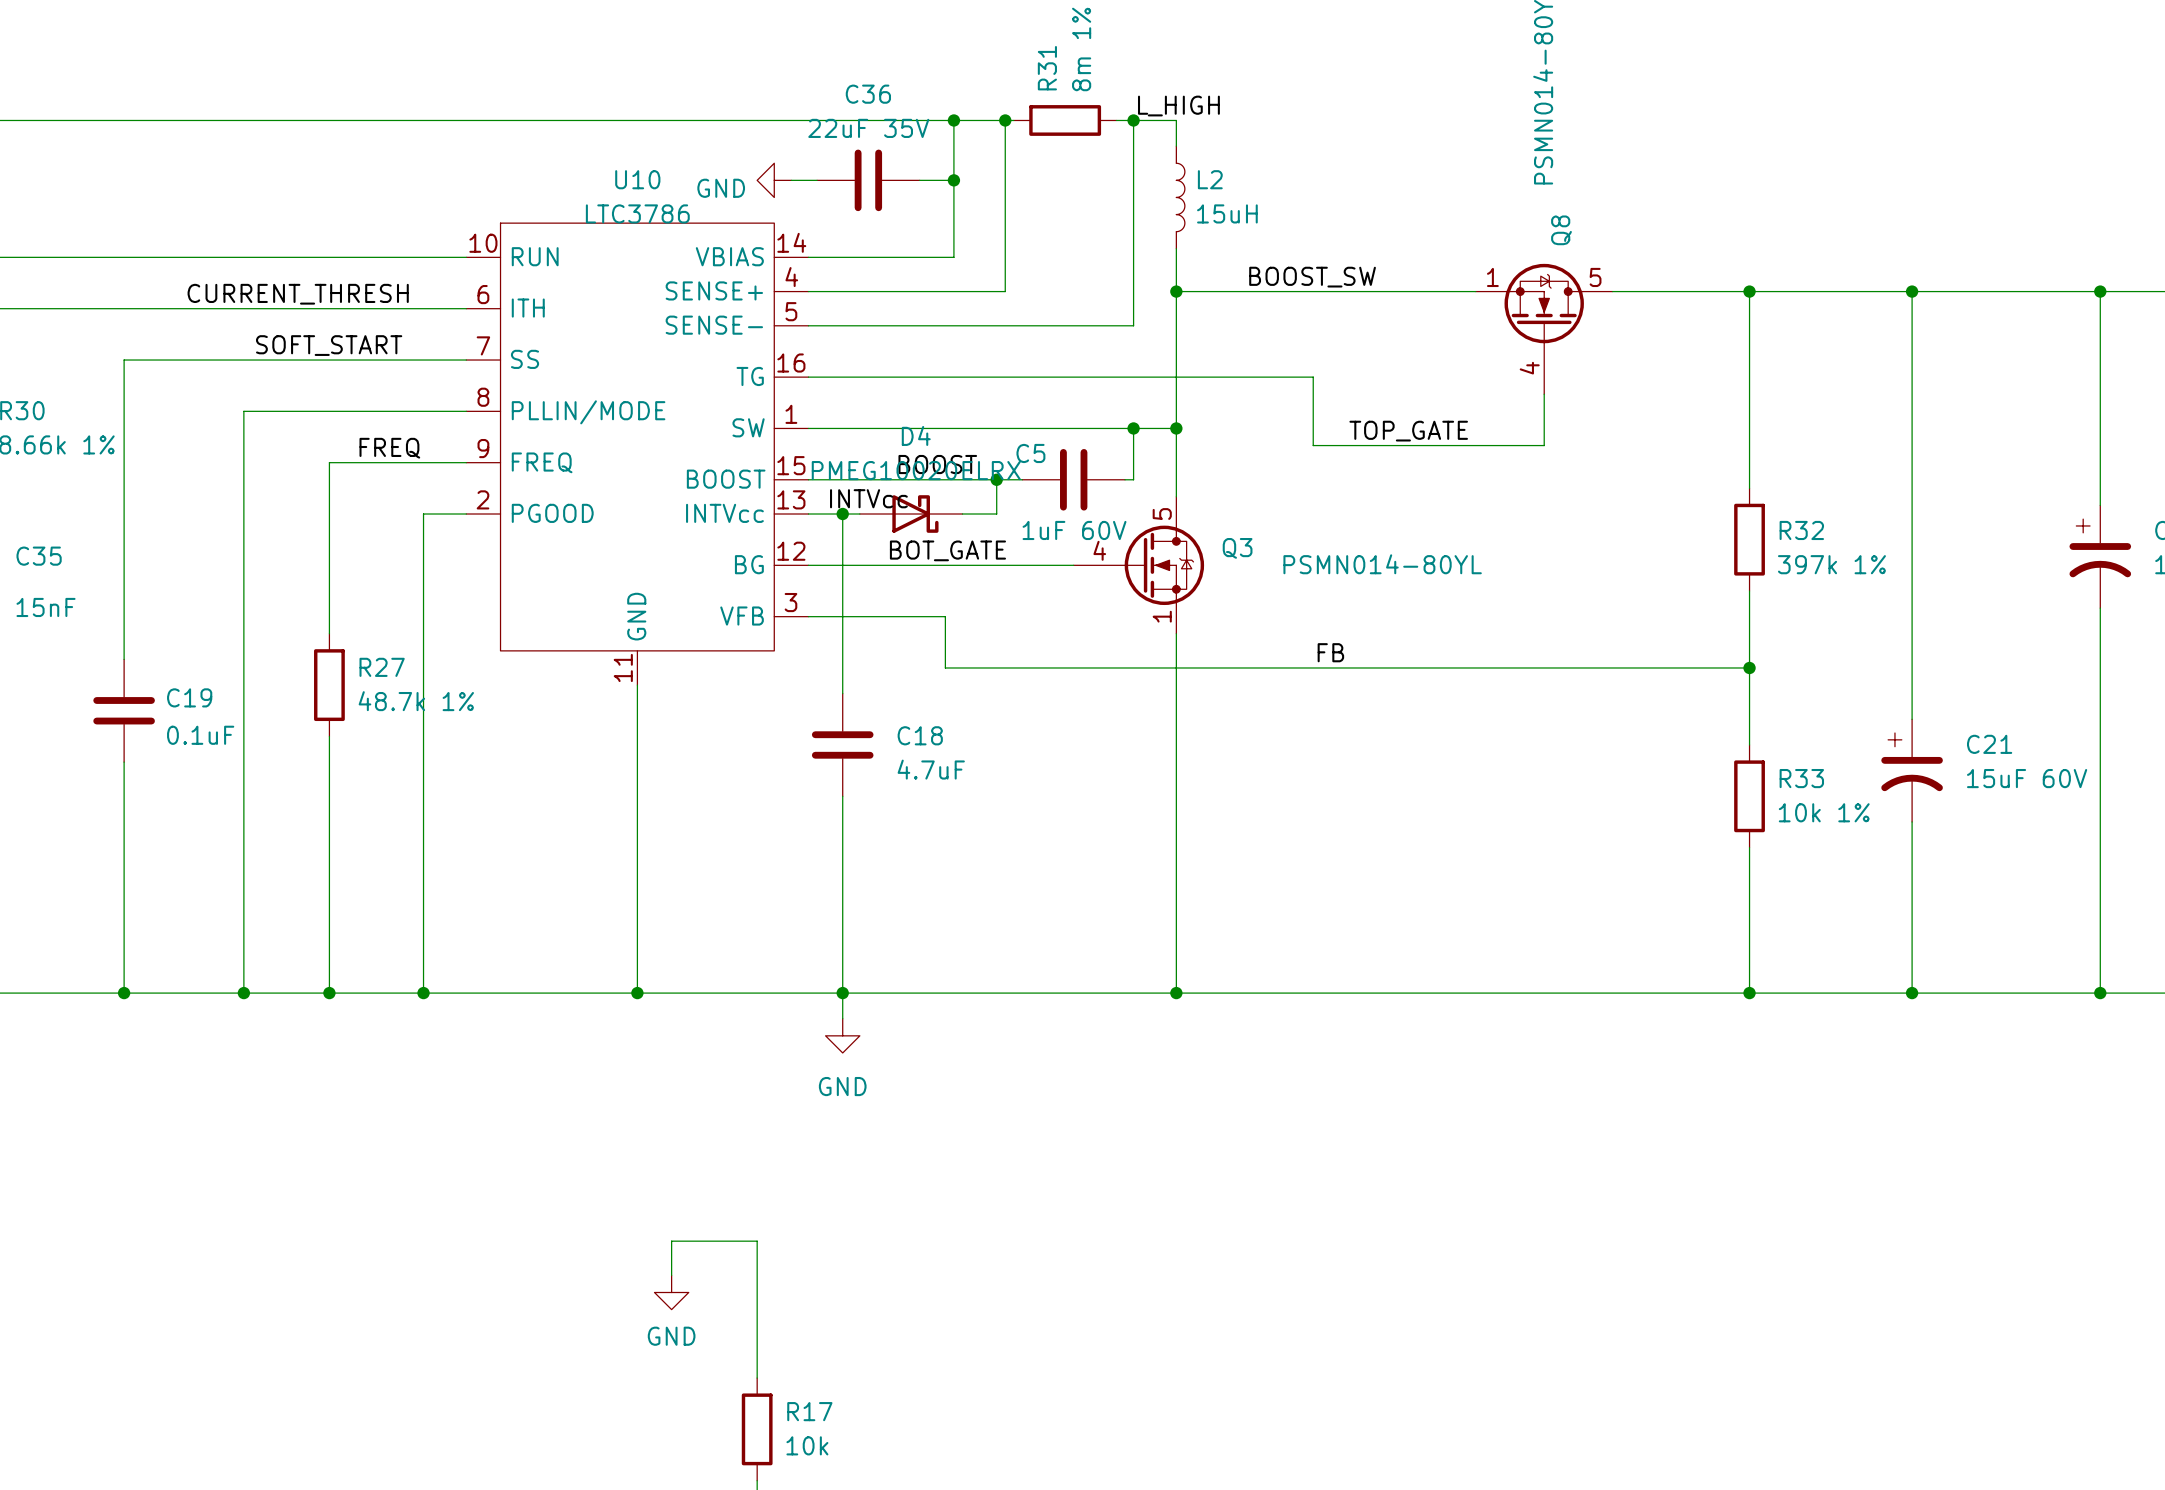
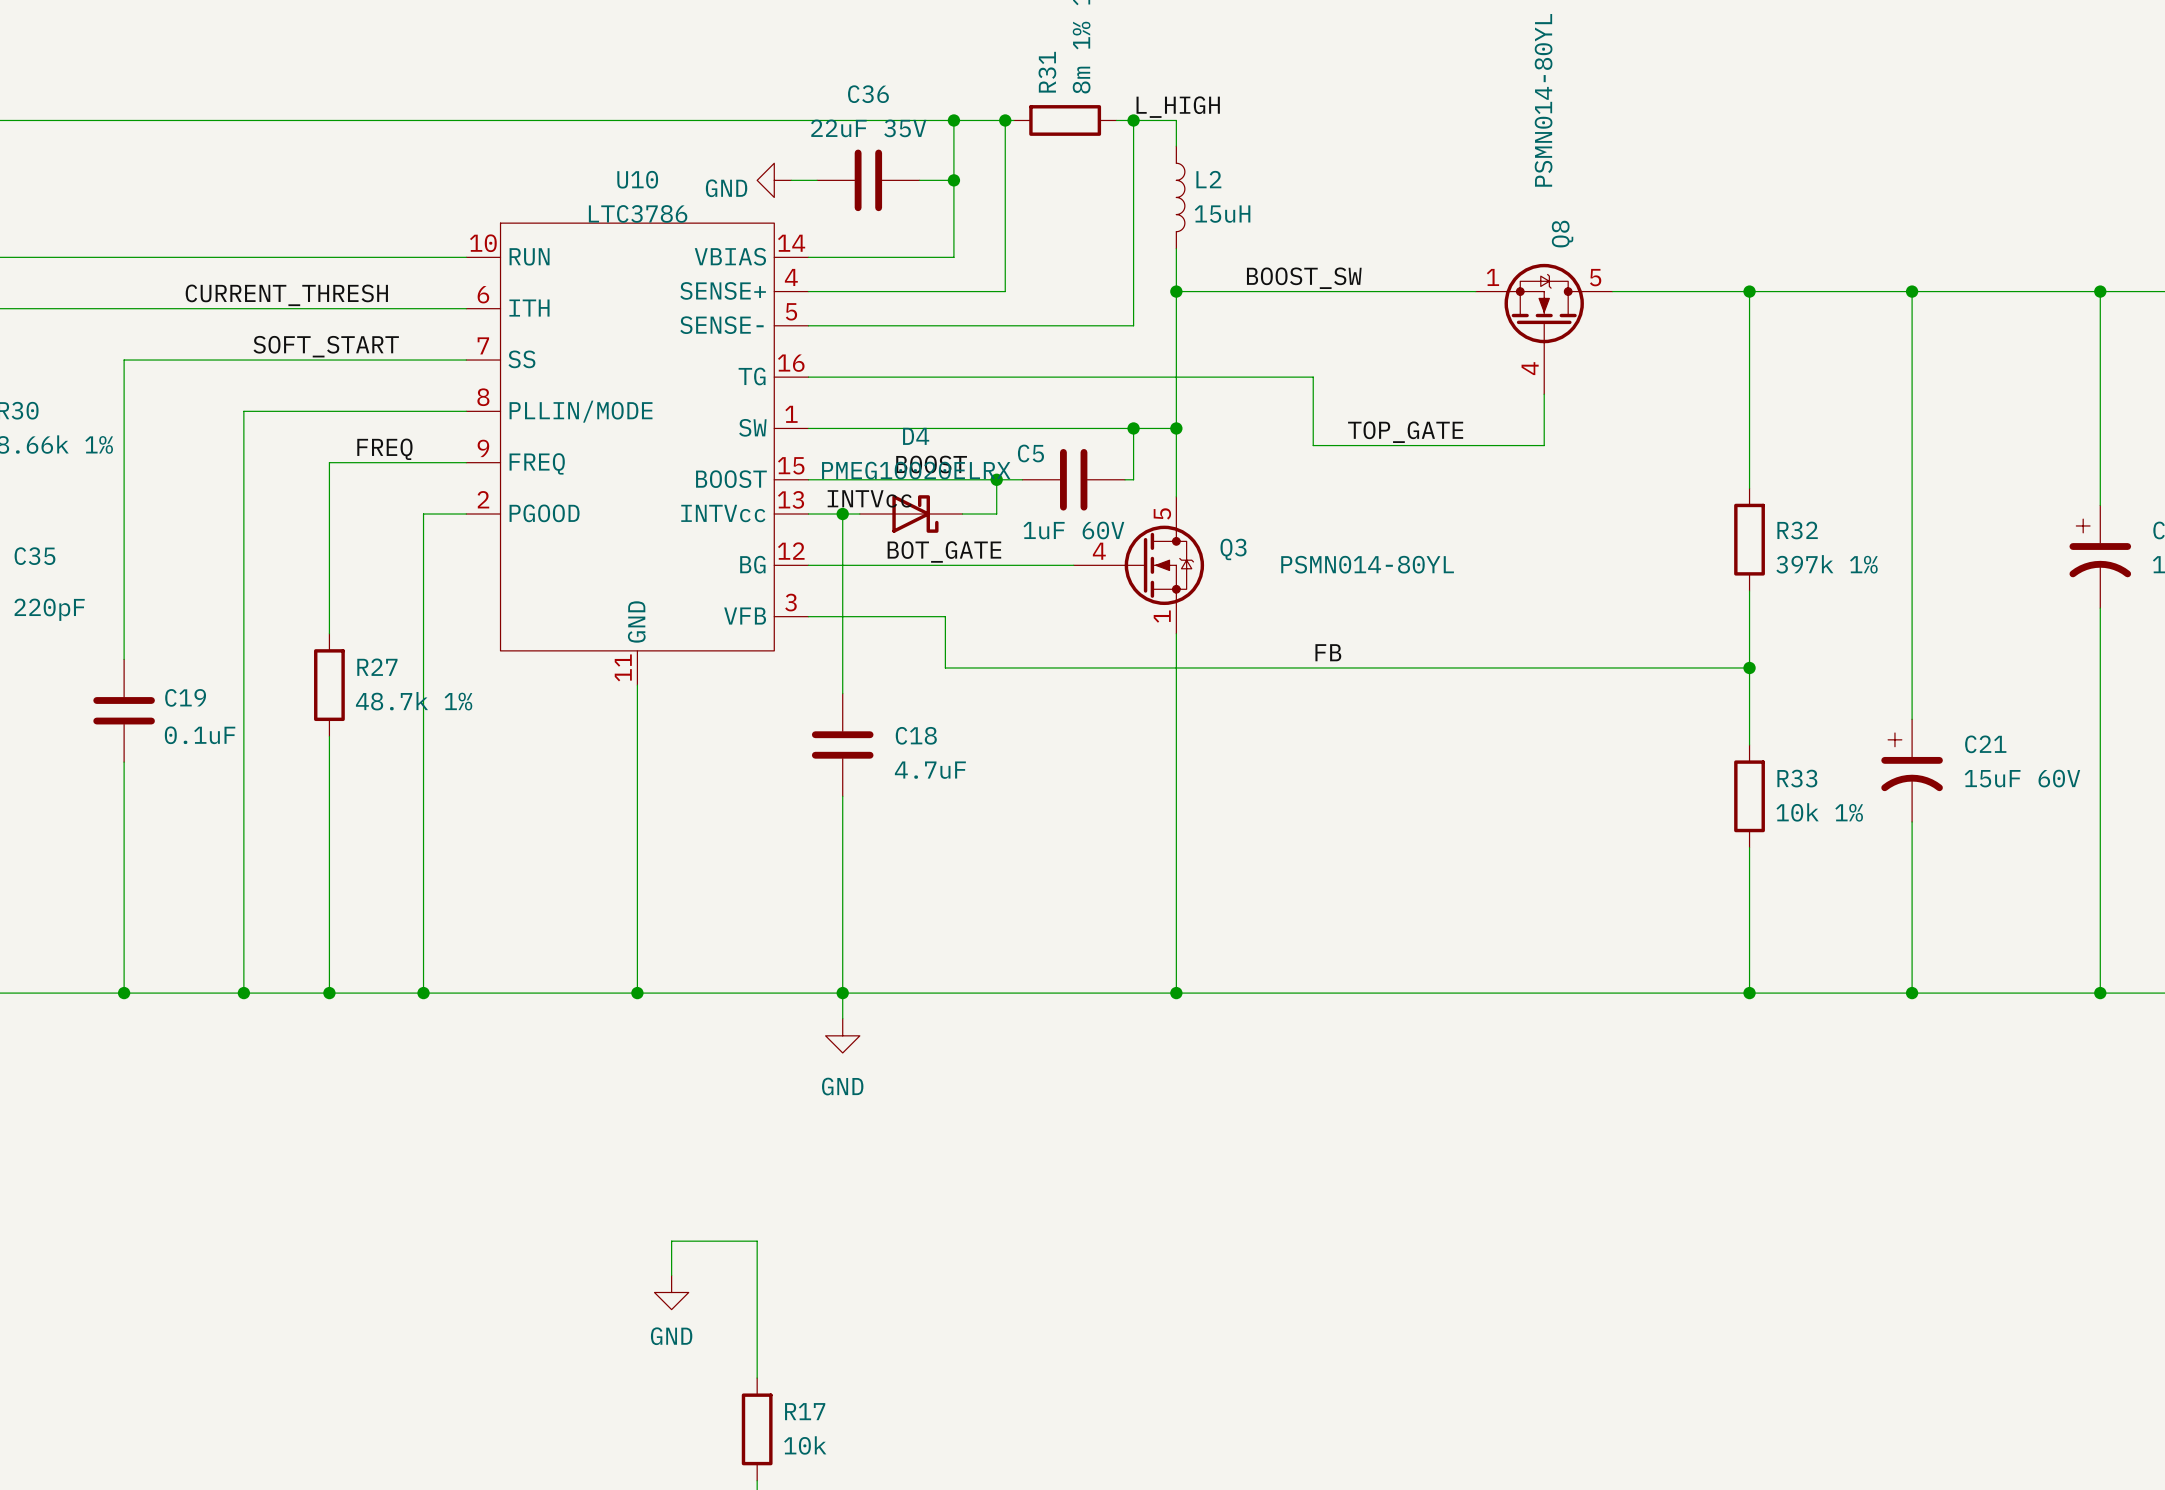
C35 value: 15nF (46, 607) -> 220pF (49, 609)

